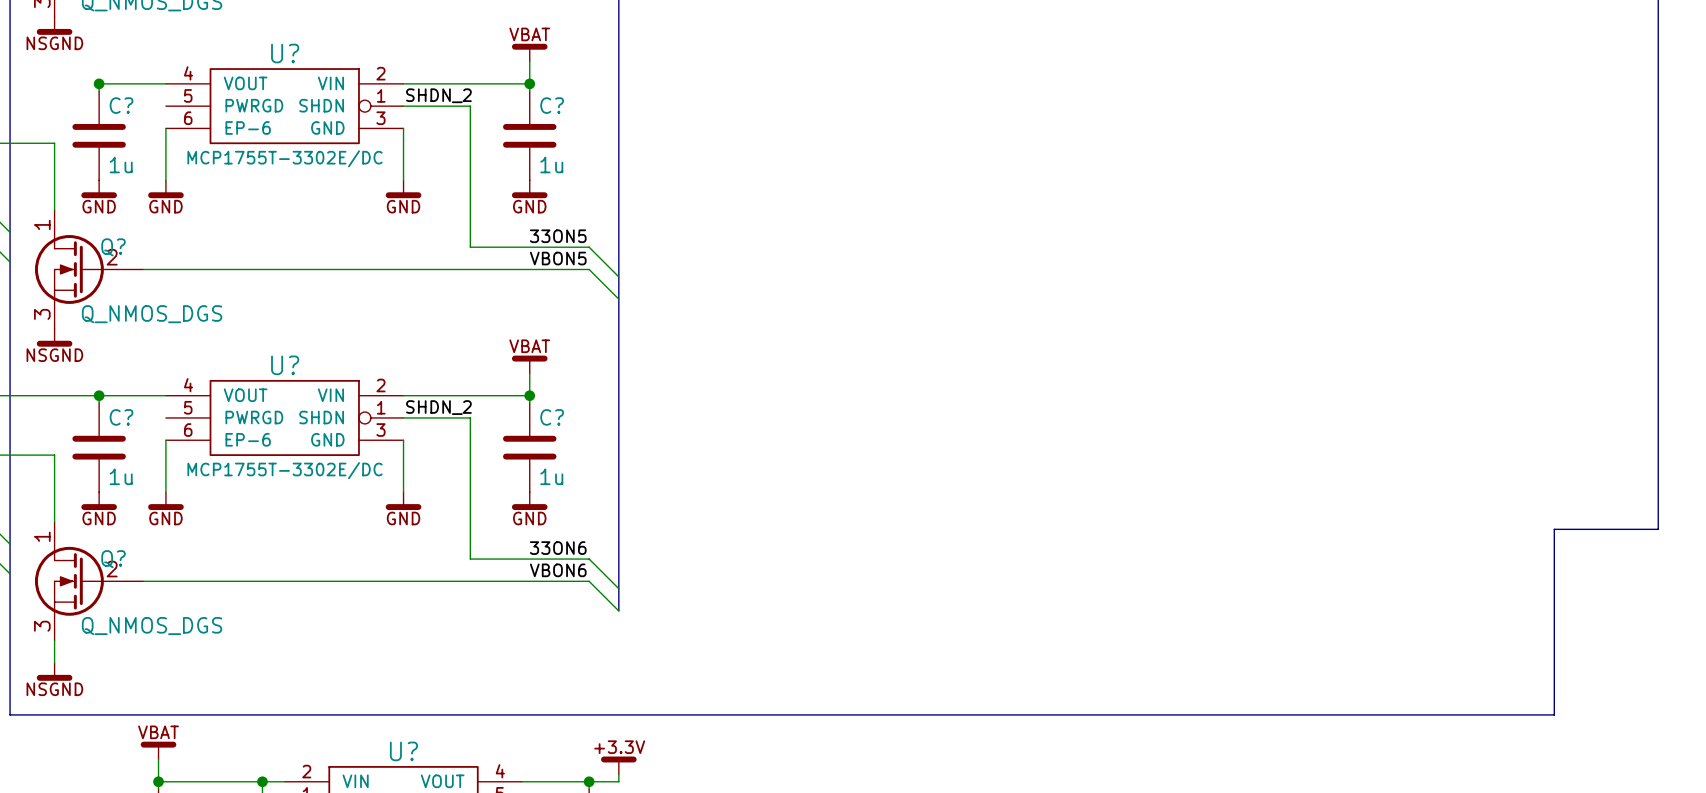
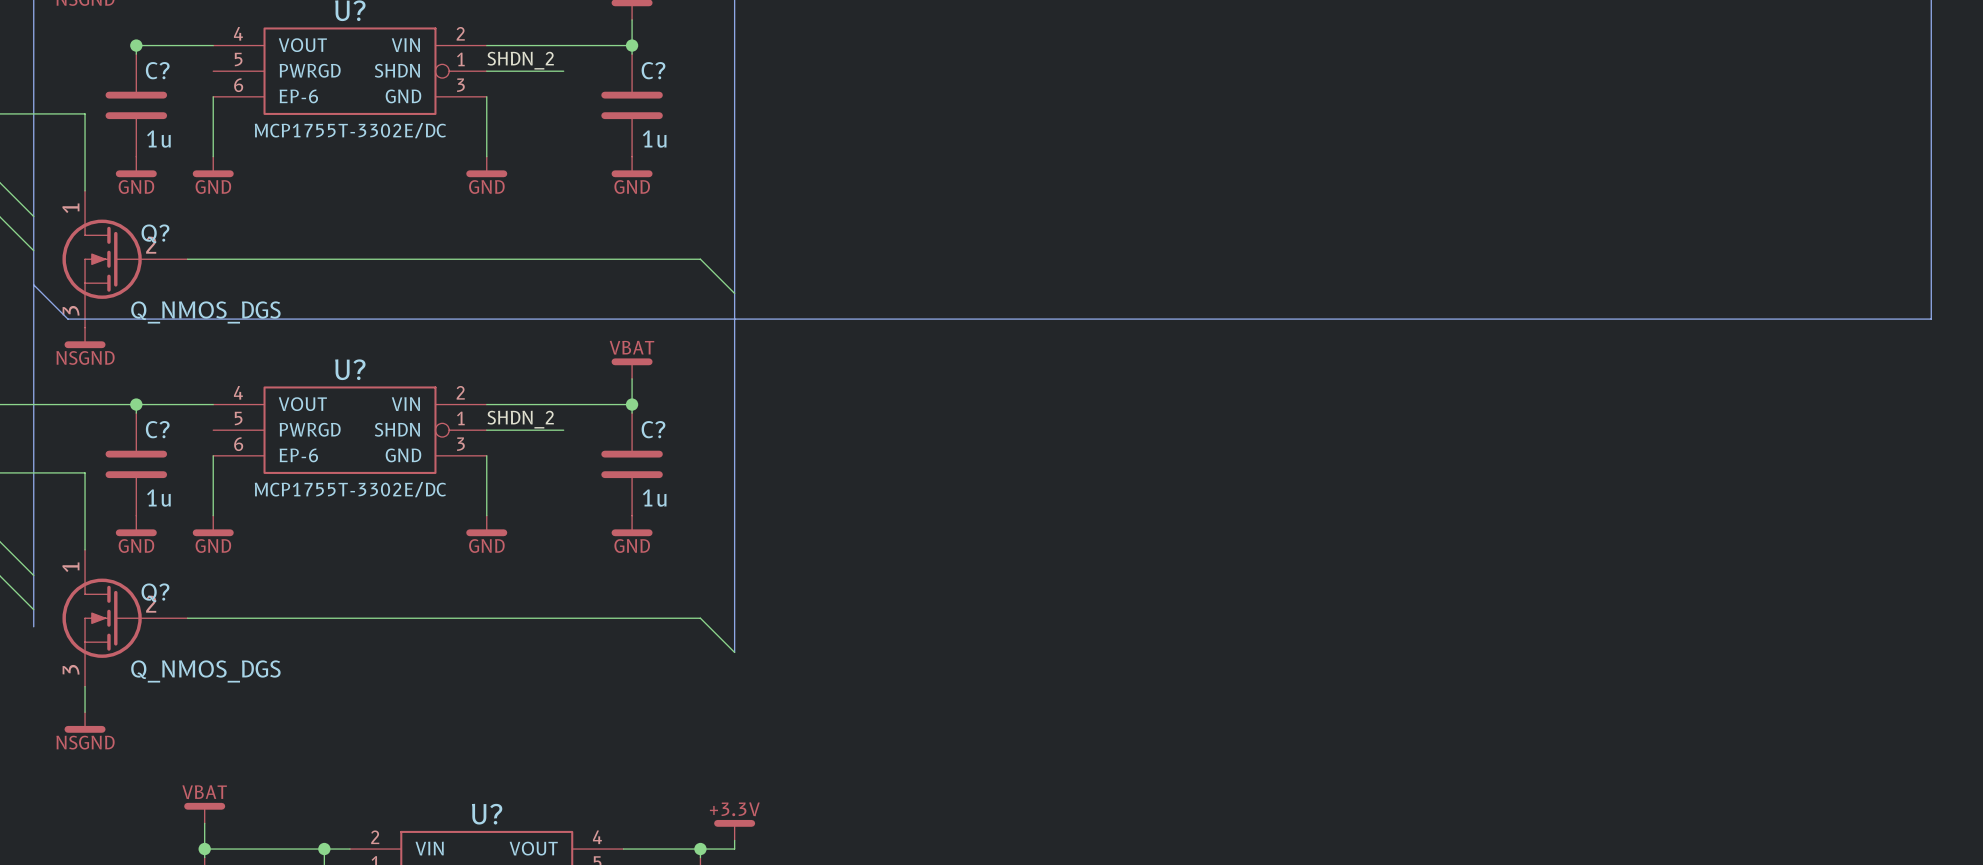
wire: (470, 106) (470, 247) (589, 247) (618, 276) -> none
label: 33ON5 (558, 236) -> none
label: VBON5 (558, 258) -> none
bus: (1658, 321) (1658, 529) (1554, 529) (1554, 714) (10, 714) (10, 588) -> (1931, 319) (67, 319) (33, 284)
wire: (470, 417) (470, 559) (589, 559) (618, 588) -> none
label: 33ON6 (558, 548) -> none
label: VBON6 (558, 570) -> none

